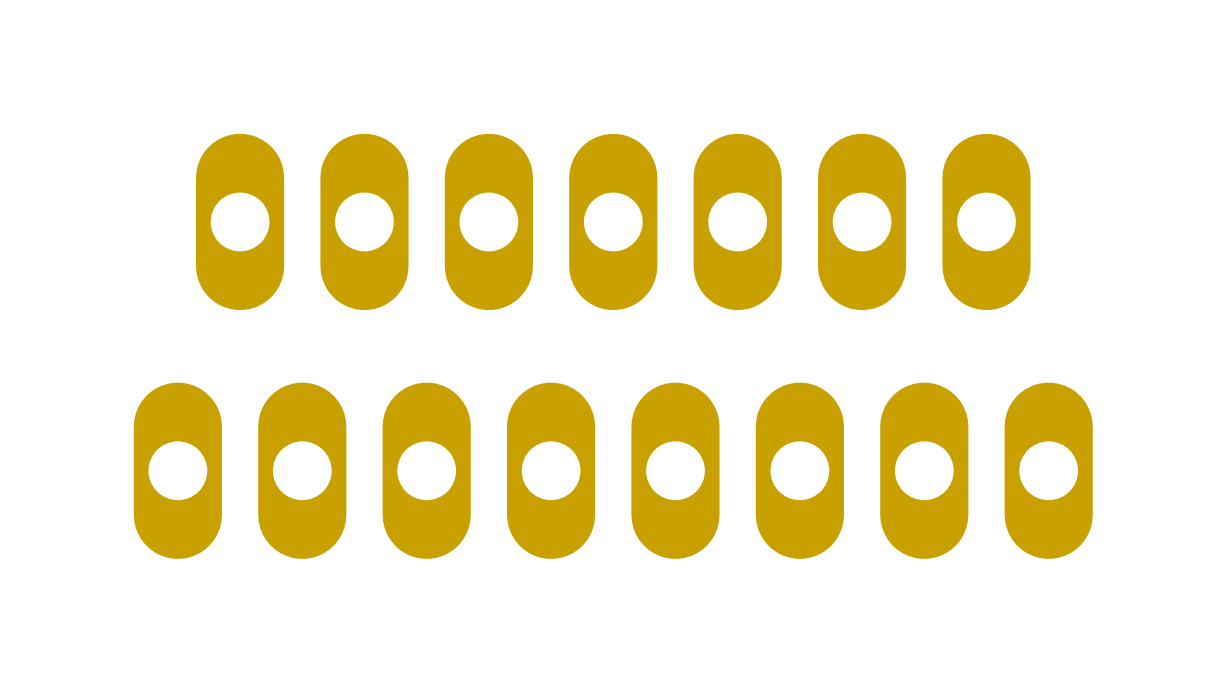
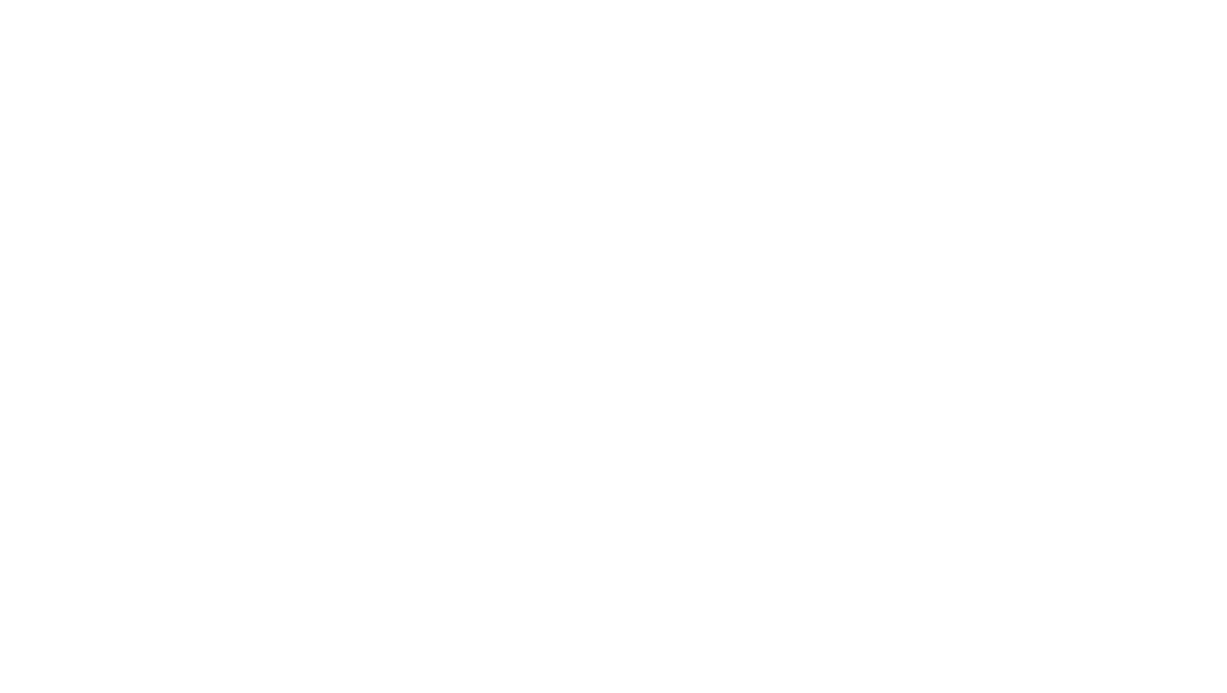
part: (613, 346) -> none

